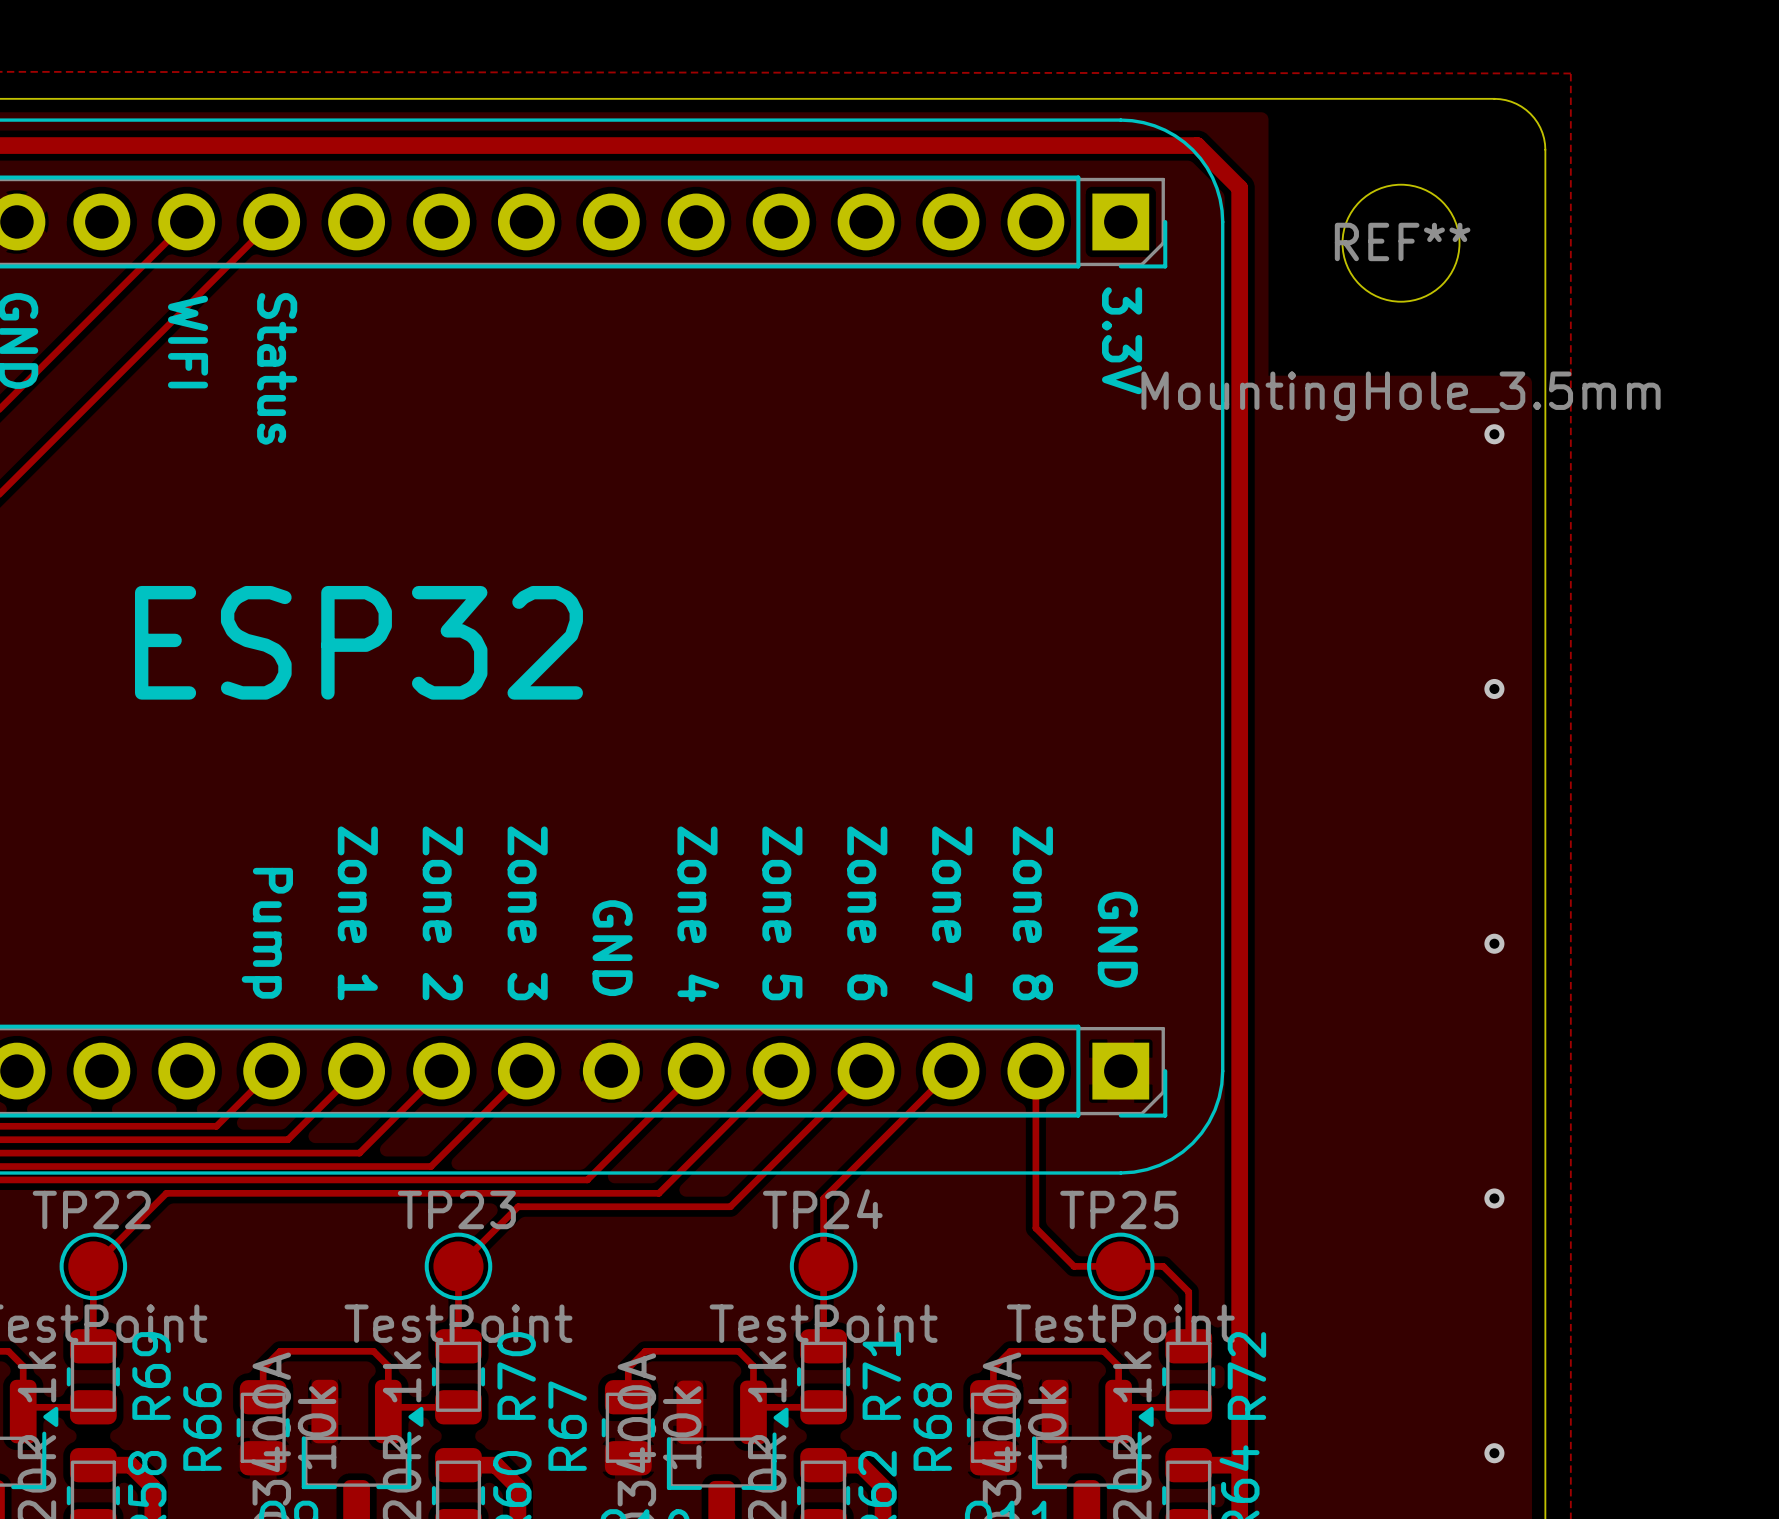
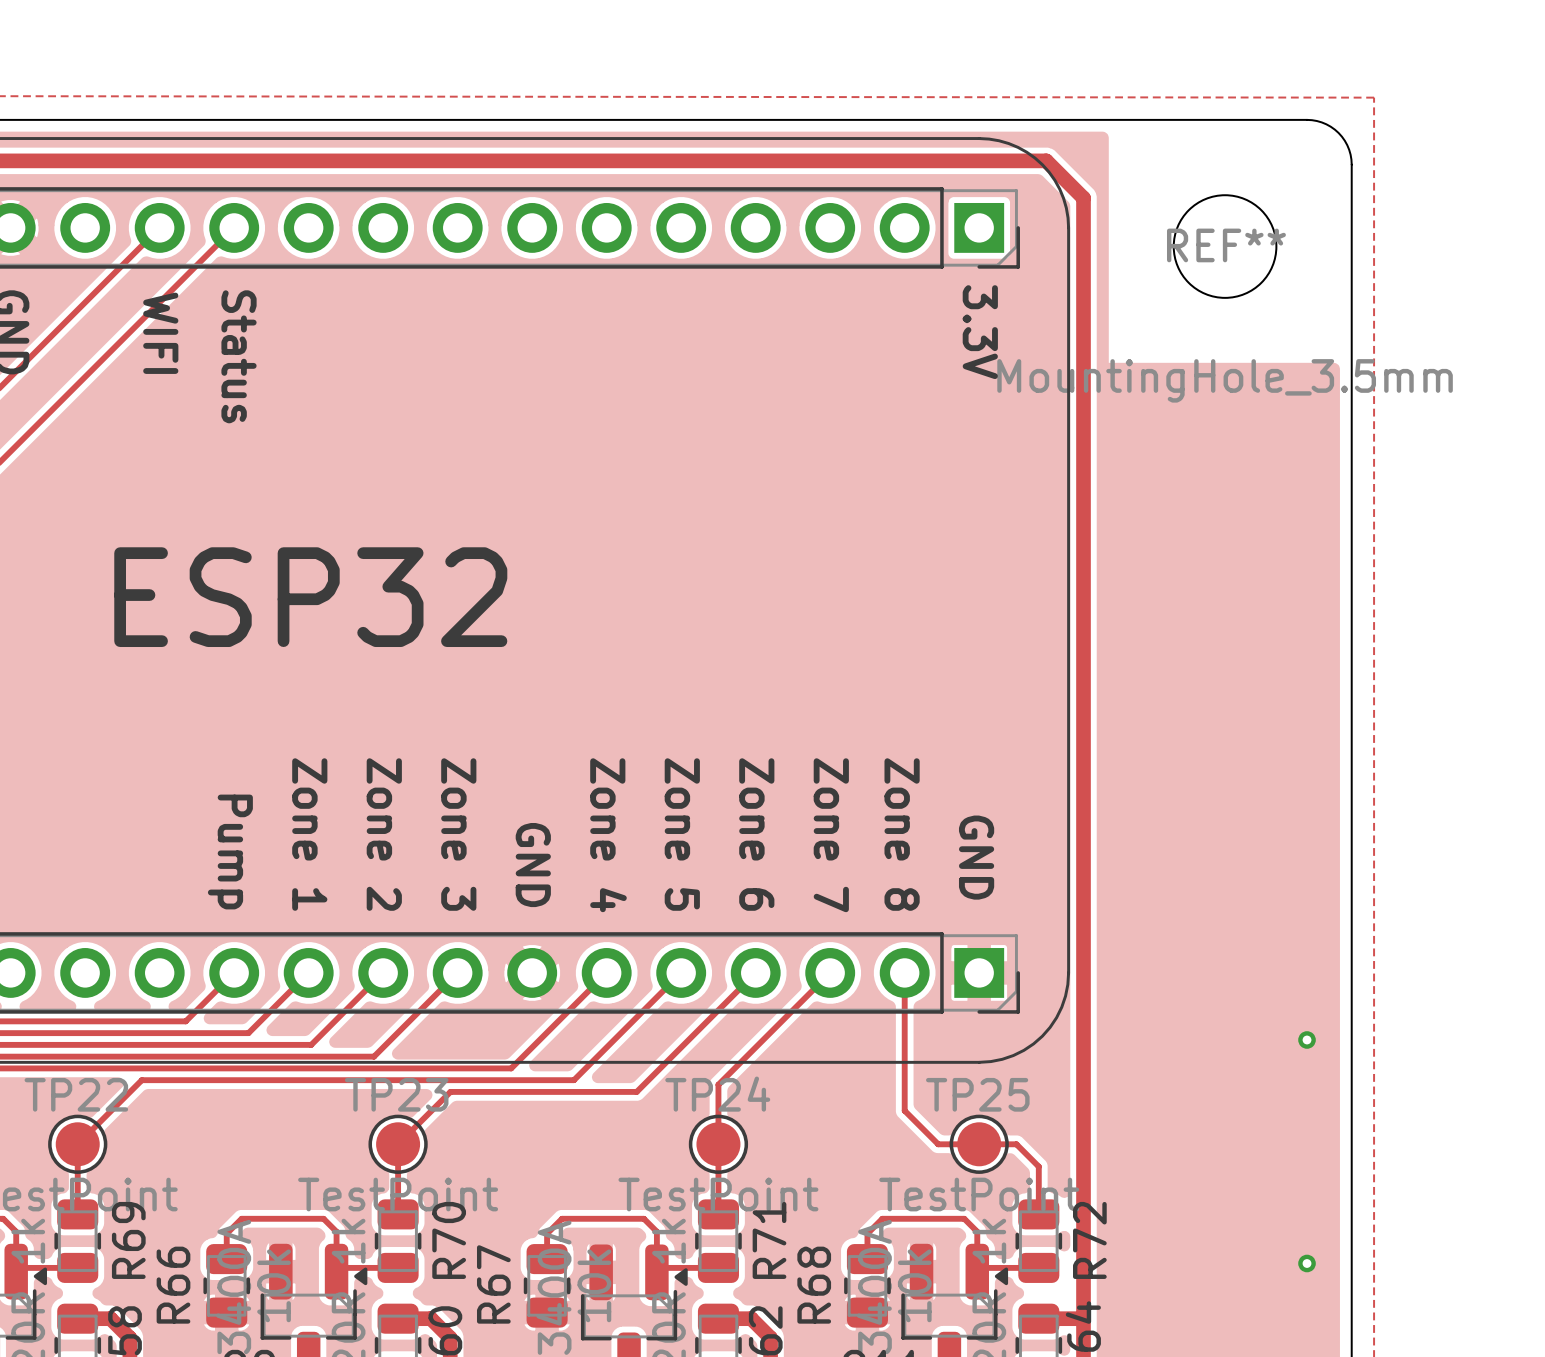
via: (1494, 434) -> none
via: (1494, 689) -> none
via: (1494, 943) -> none
via position: (1494, 1198) -> (1307, 1039)
via position: (1494, 1453) -> (1307, 1263)

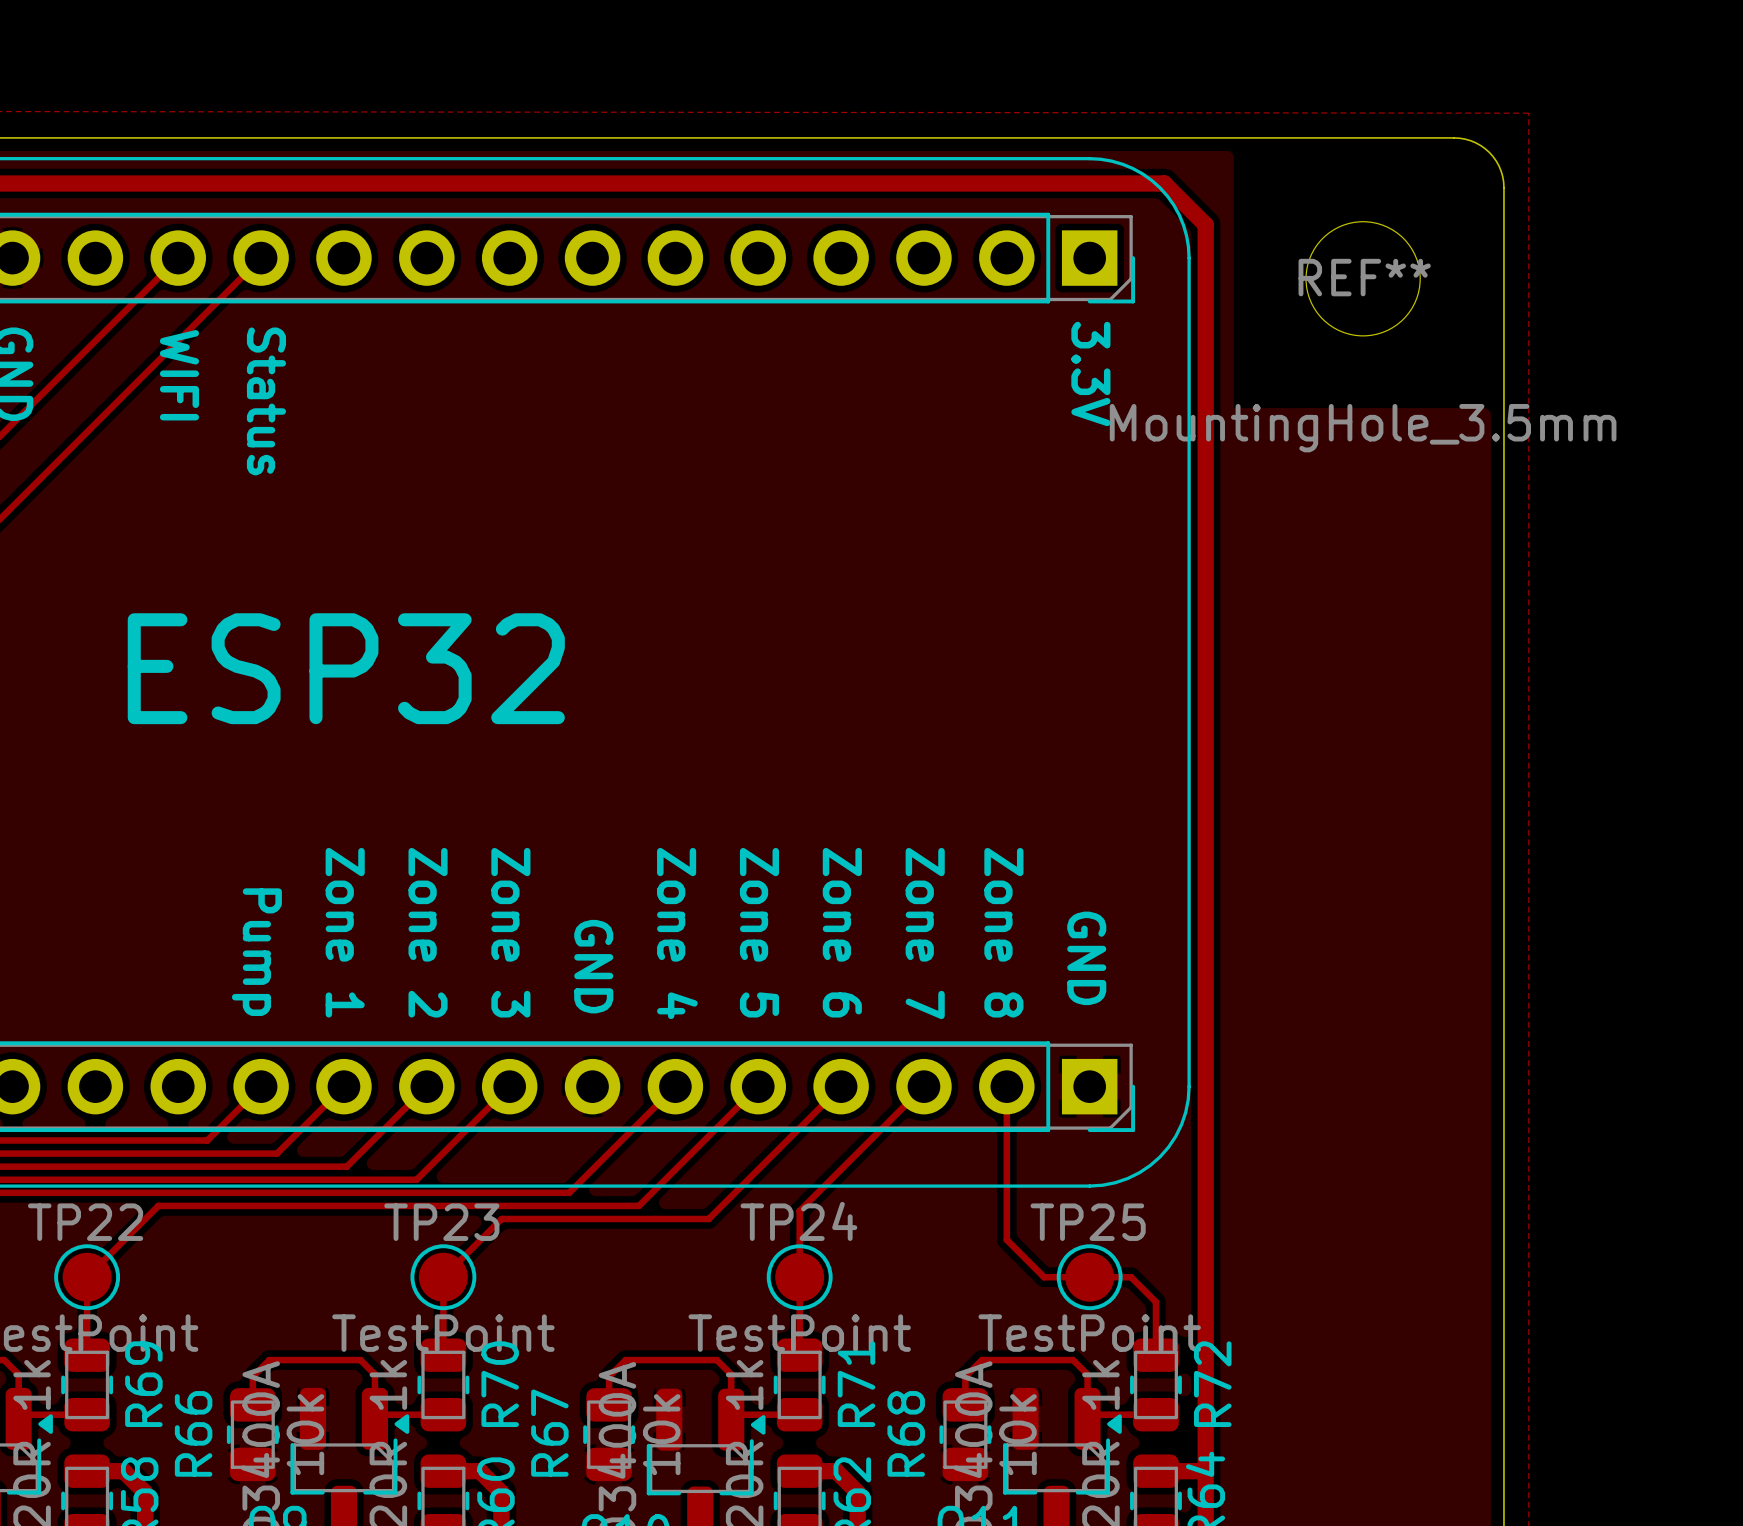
via: (1307, 1039) -> none
via: (1307, 1263) -> none

